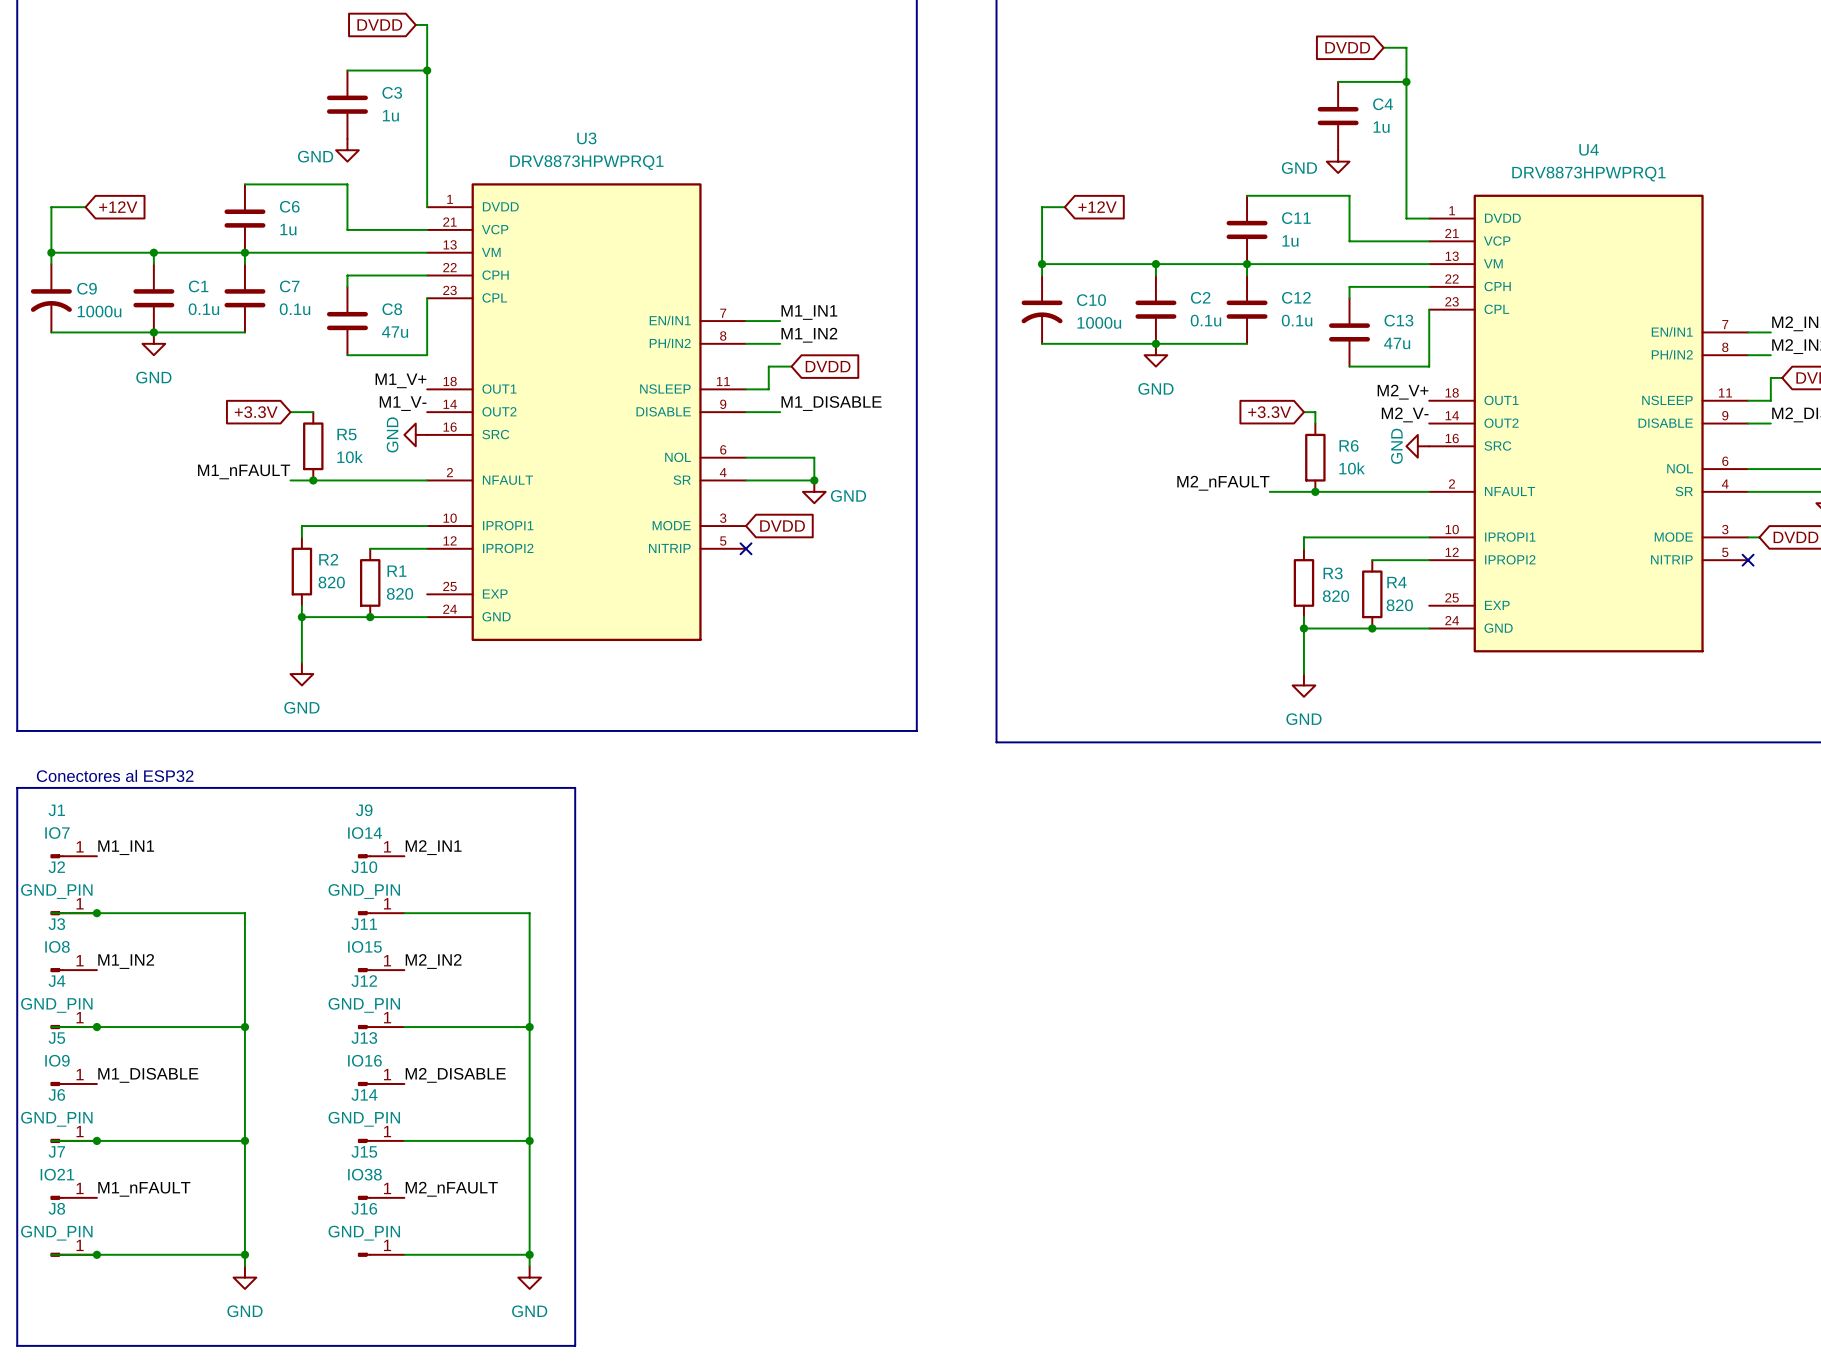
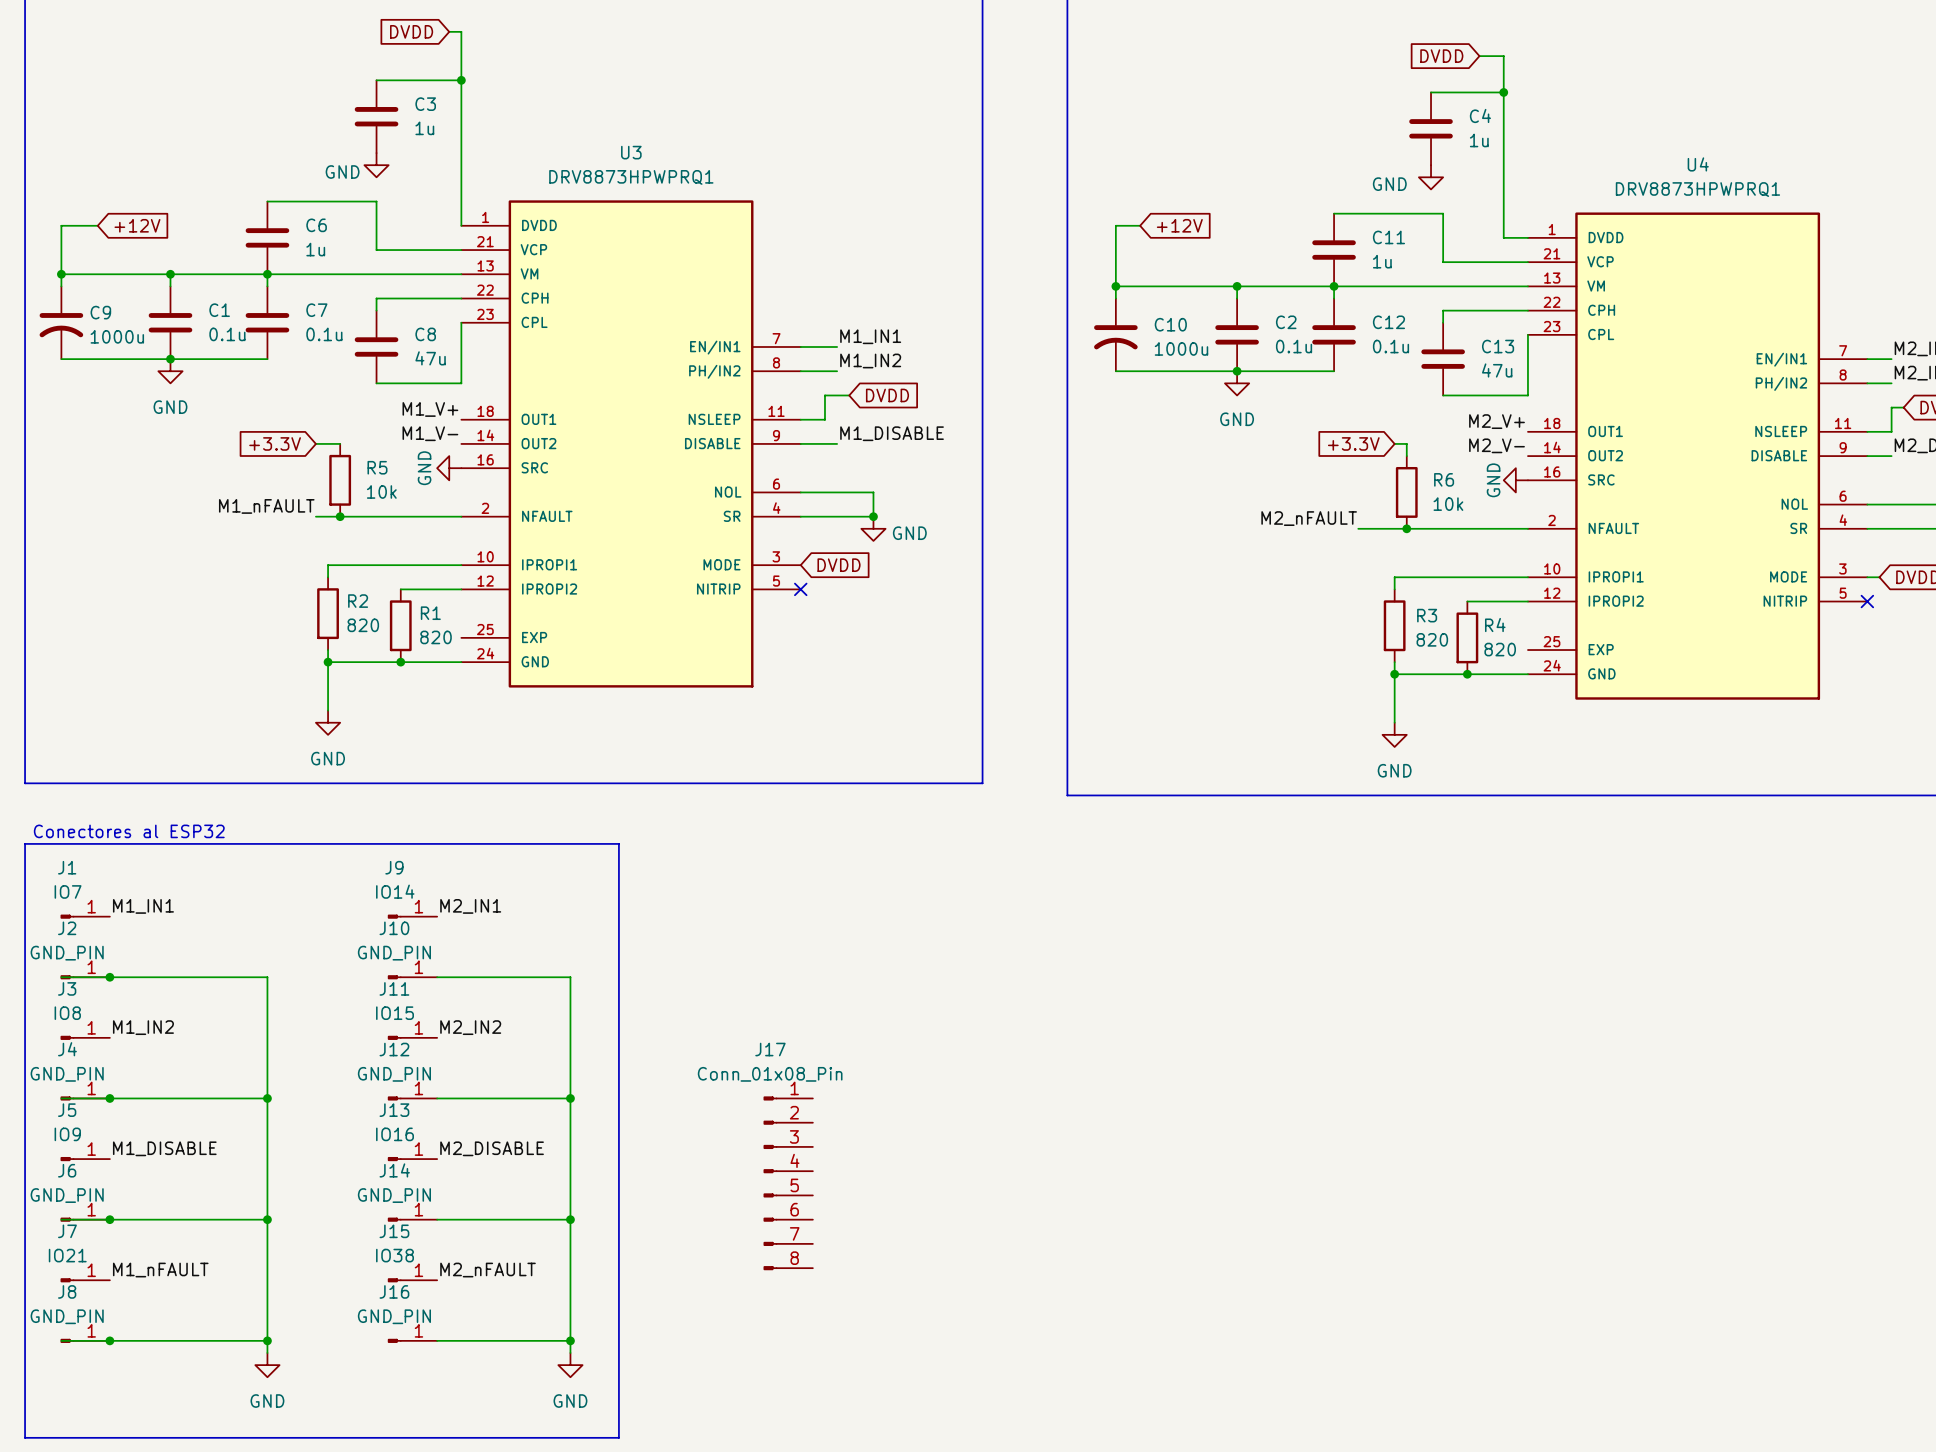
J17: none -> Conn_01x08_Pin (788, 1183)

